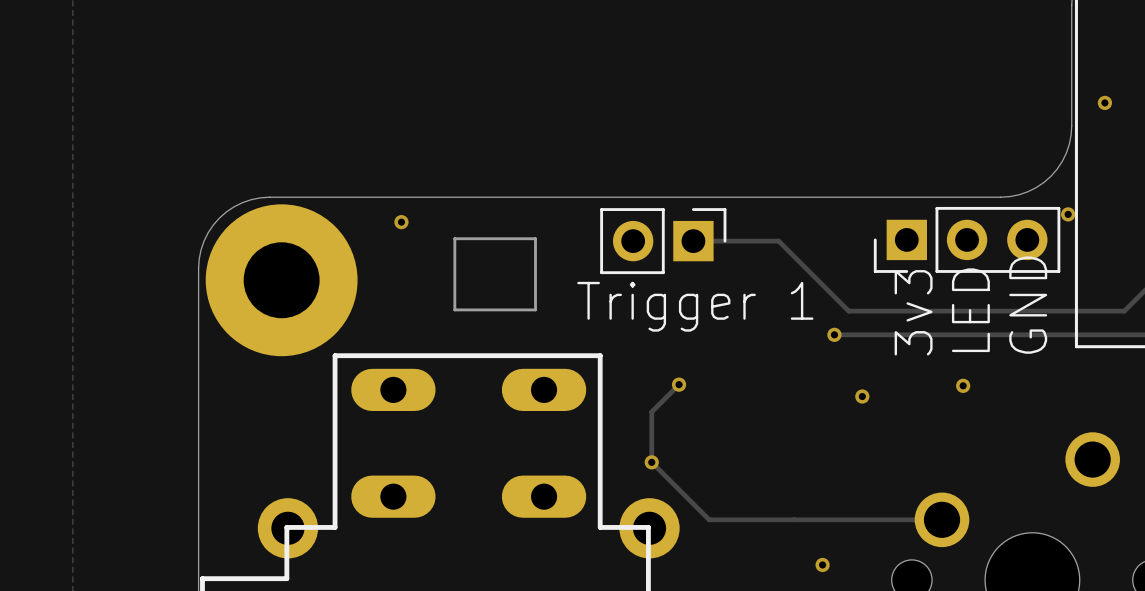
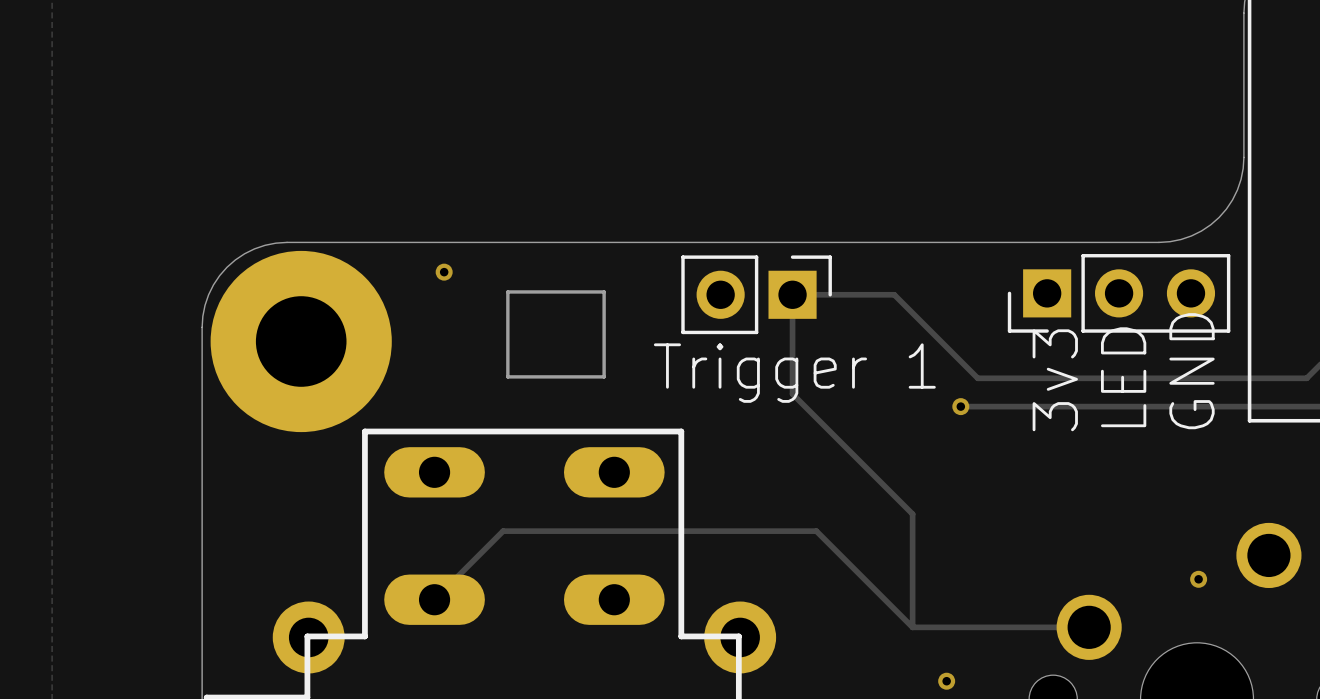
via: (1104, 102) -> none
via: (1068, 214) -> none
track: none -> (792, 294) (792, 394) (912, 514) (912, 627) (816, 531) (503, 531) (434, 599)
track: (679, 384) (651, 411) (651, 462) (709, 519) (794, 519) -> none
via: (679, 384) -> none
via: (963, 385) -> none
via: (862, 396) -> none
via: (651, 462) -> none
via: none -> (1198, 579)

